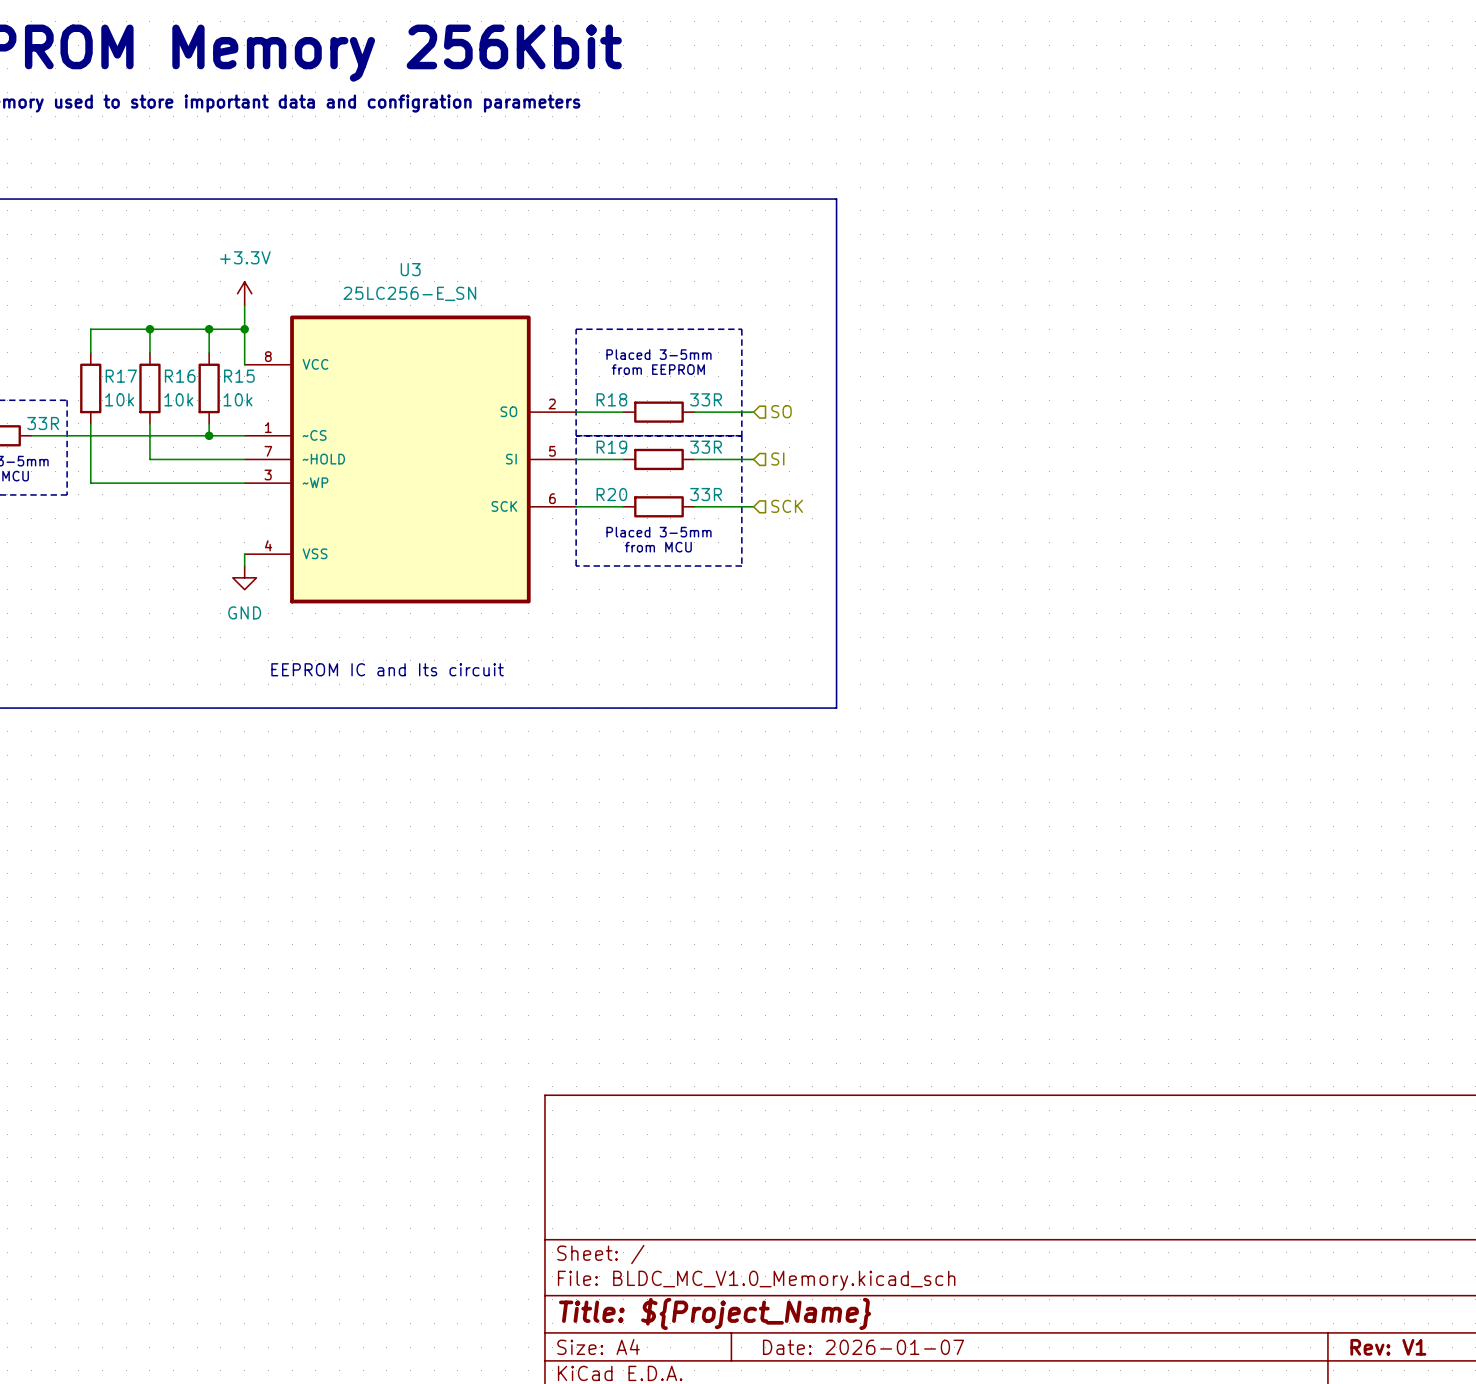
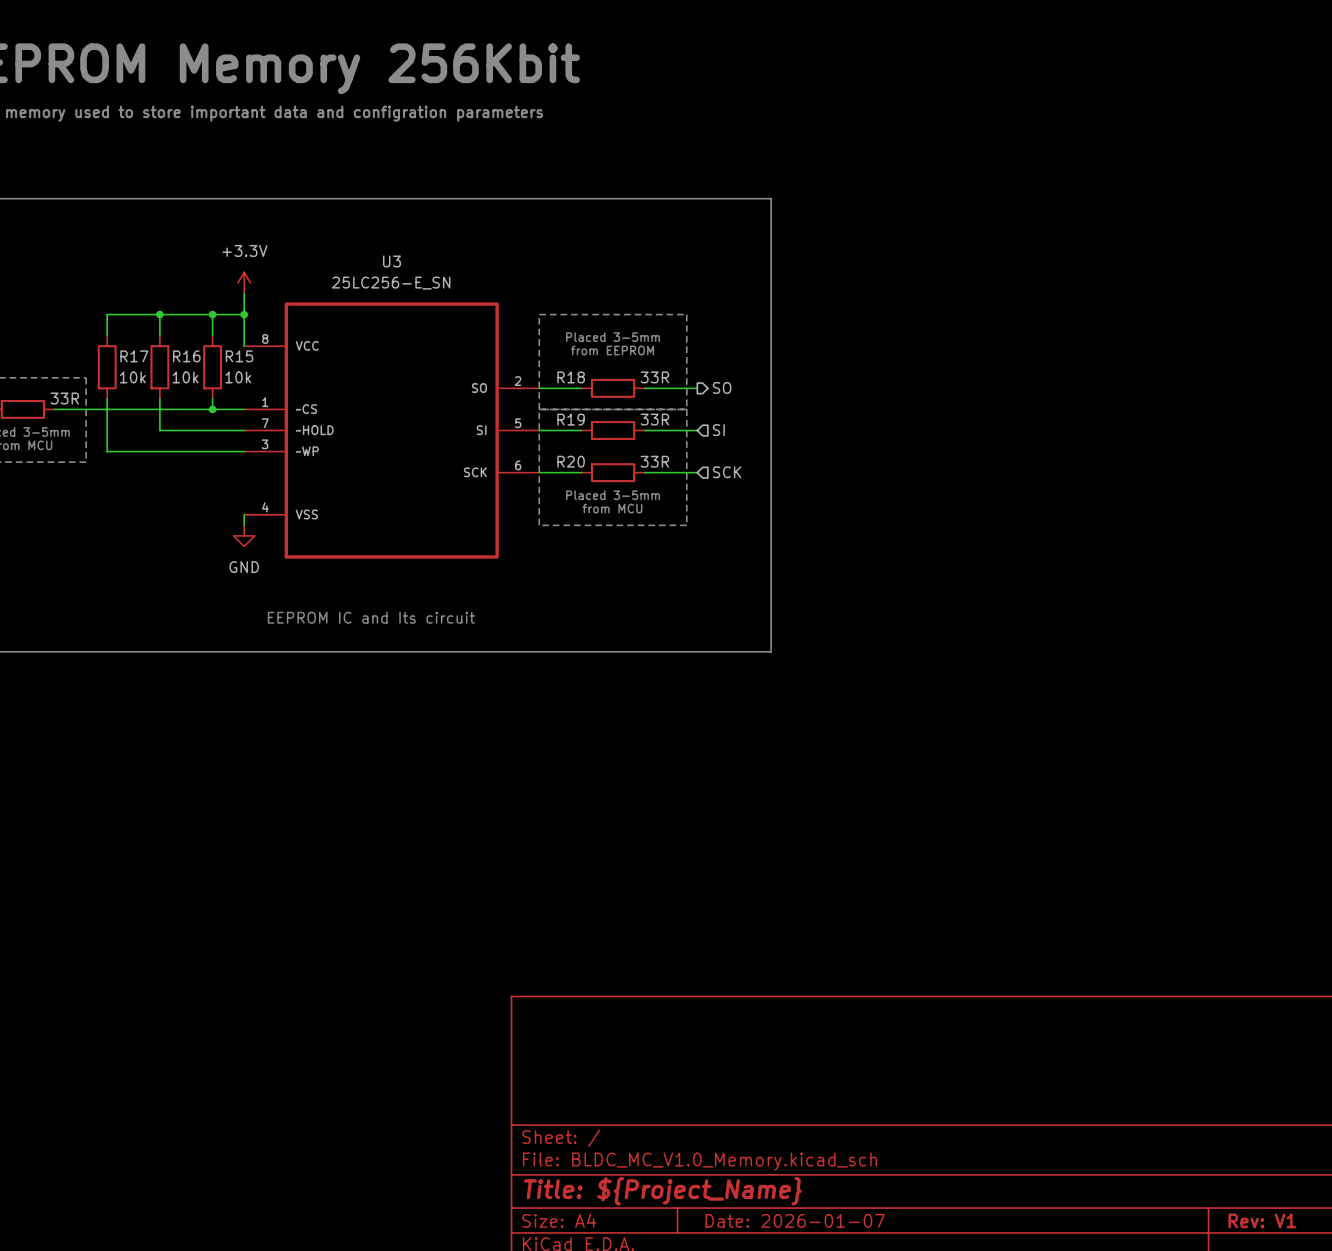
hierarchical label shape: input (781, 411) -> output (722, 387)

